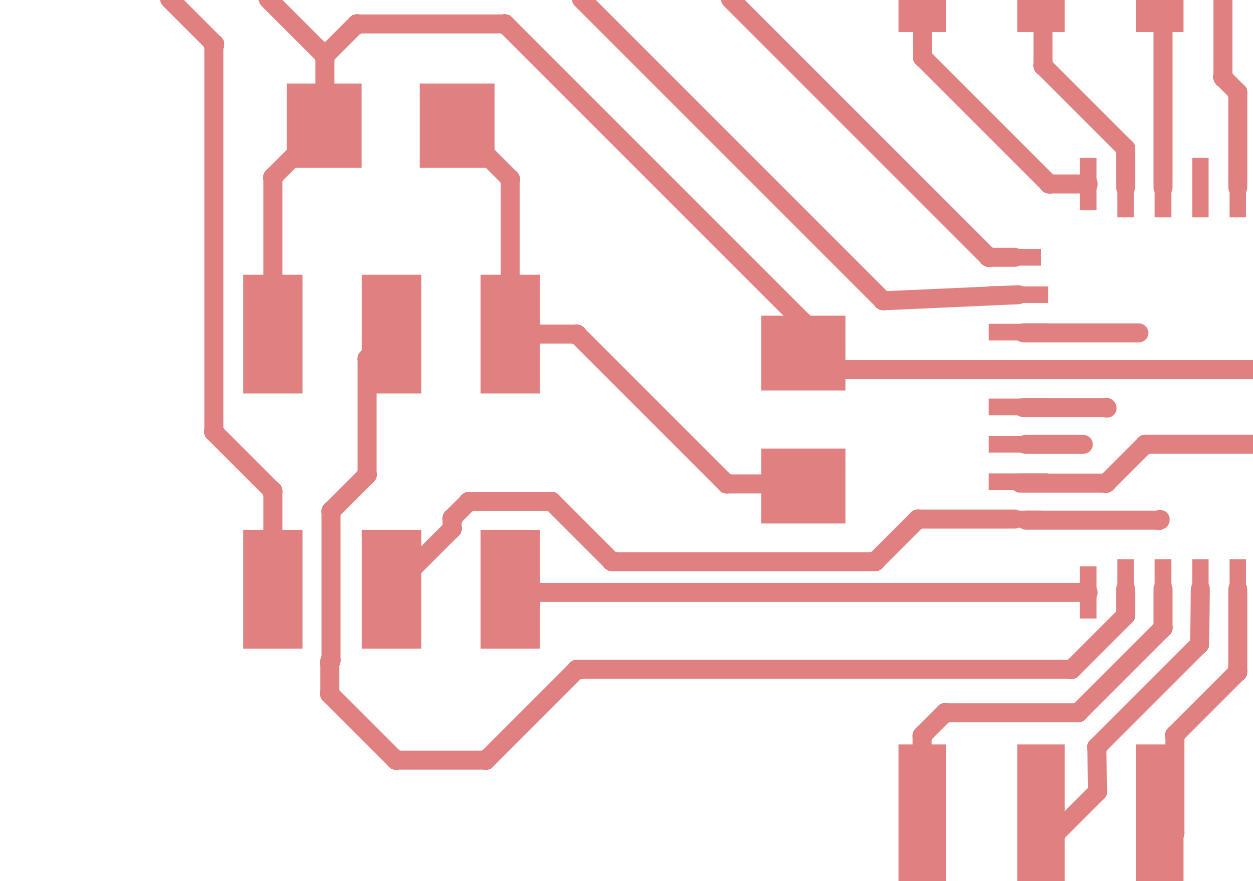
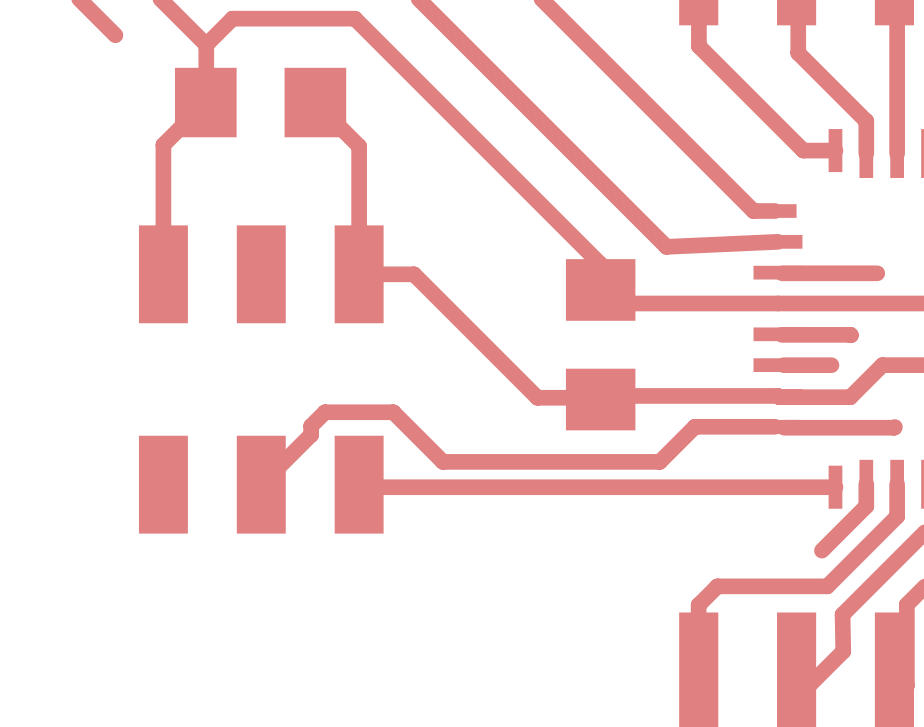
top track: (214, 44) (213, 432) (272, 491) (272, 589) -> none
top track: (391, 334) (367, 358) (367, 475) (331, 511) (329, 694) (395, 760) (486, 760) (576, 669) (1071, 669) -> none
top track: none -> (604, 395) (779, 397)

